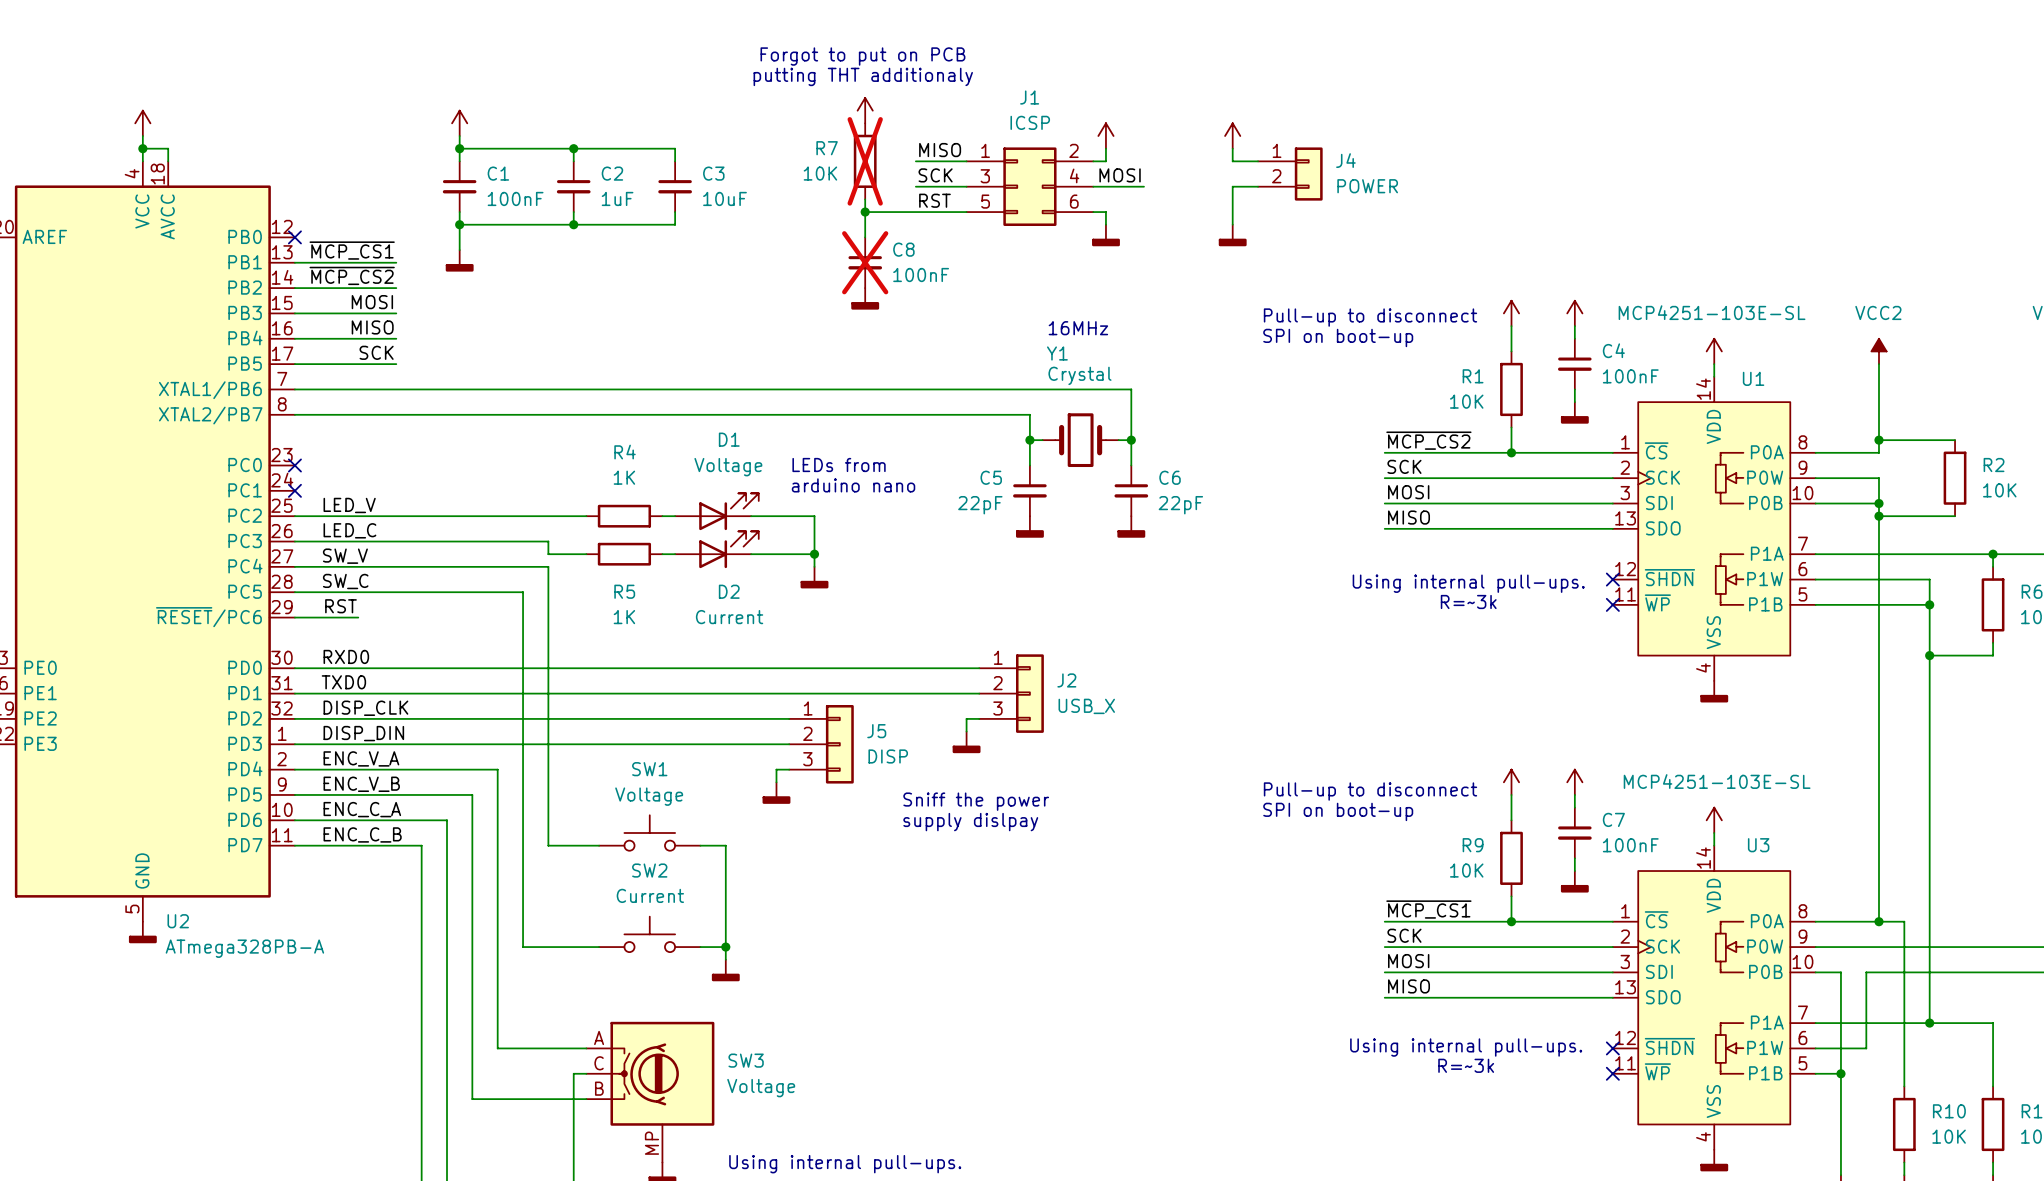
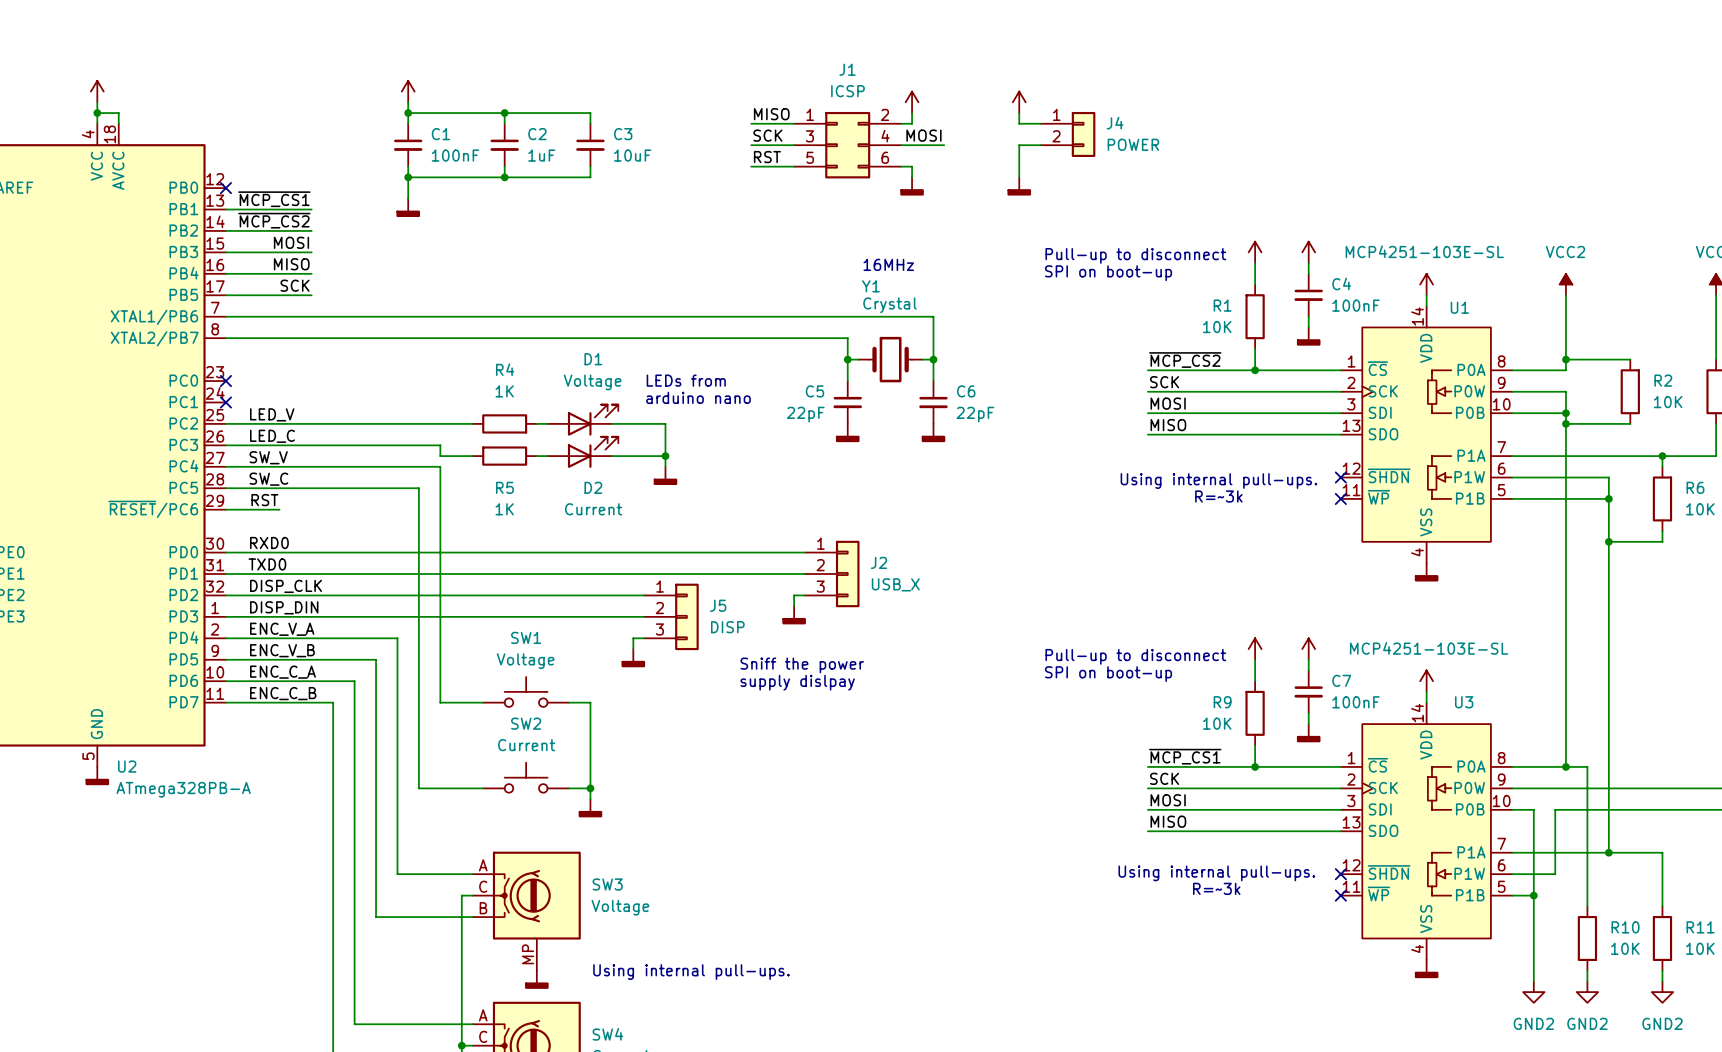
text: Forgot to put on PCB (862, 56) -> none
text: putting THT additionaly (863, 76) -> none
power symbol: (865, 110) -> none
power symbol position: (459, 123) -> (408, 91)
wire: (459, 136) (459, 161) -> (408, 102) (408, 123)
wire: (459, 148) (510, 148) -> none
junction: (459, 148) -> none
junction: none -> (408, 113)
wire: (573, 148) (573, 161) -> (504, 113) (504, 123)
junction: (573, 148) -> none
junction: none -> (504, 113)
wire: (675, 148) (675, 161) -> (547, 113) (590, 113) (590, 123)
R7: 10K (865, 161) -> none
C1 position: (459, 186) -> (408, 145)
C2 position: (573, 186) -> (504, 145)
C3 position: (675, 186) -> (590, 145)
wire: (865, 199) (865, 237) -> none
wire: (459, 212) (459, 250) -> (408, 166) (408, 198)
wire: (573, 212) (573, 224) -> (504, 166) (504, 177)
wire: (675, 212) (675, 224) -> (590, 166) (590, 177) (547, 177)
wire: (865, 212) (915, 212) -> none
junction: (865, 212) -> none
wire: (459, 224) (510, 224) -> none
junction: (459, 224) -> none
junction: none -> (408, 177)
junction: (573, 224) -> none
junction: none -> (504, 177)
power symbol position: (459, 260) -> (408, 207)
C8: 100nF (865, 262) -> none
power symbol: (865, 298) -> none

